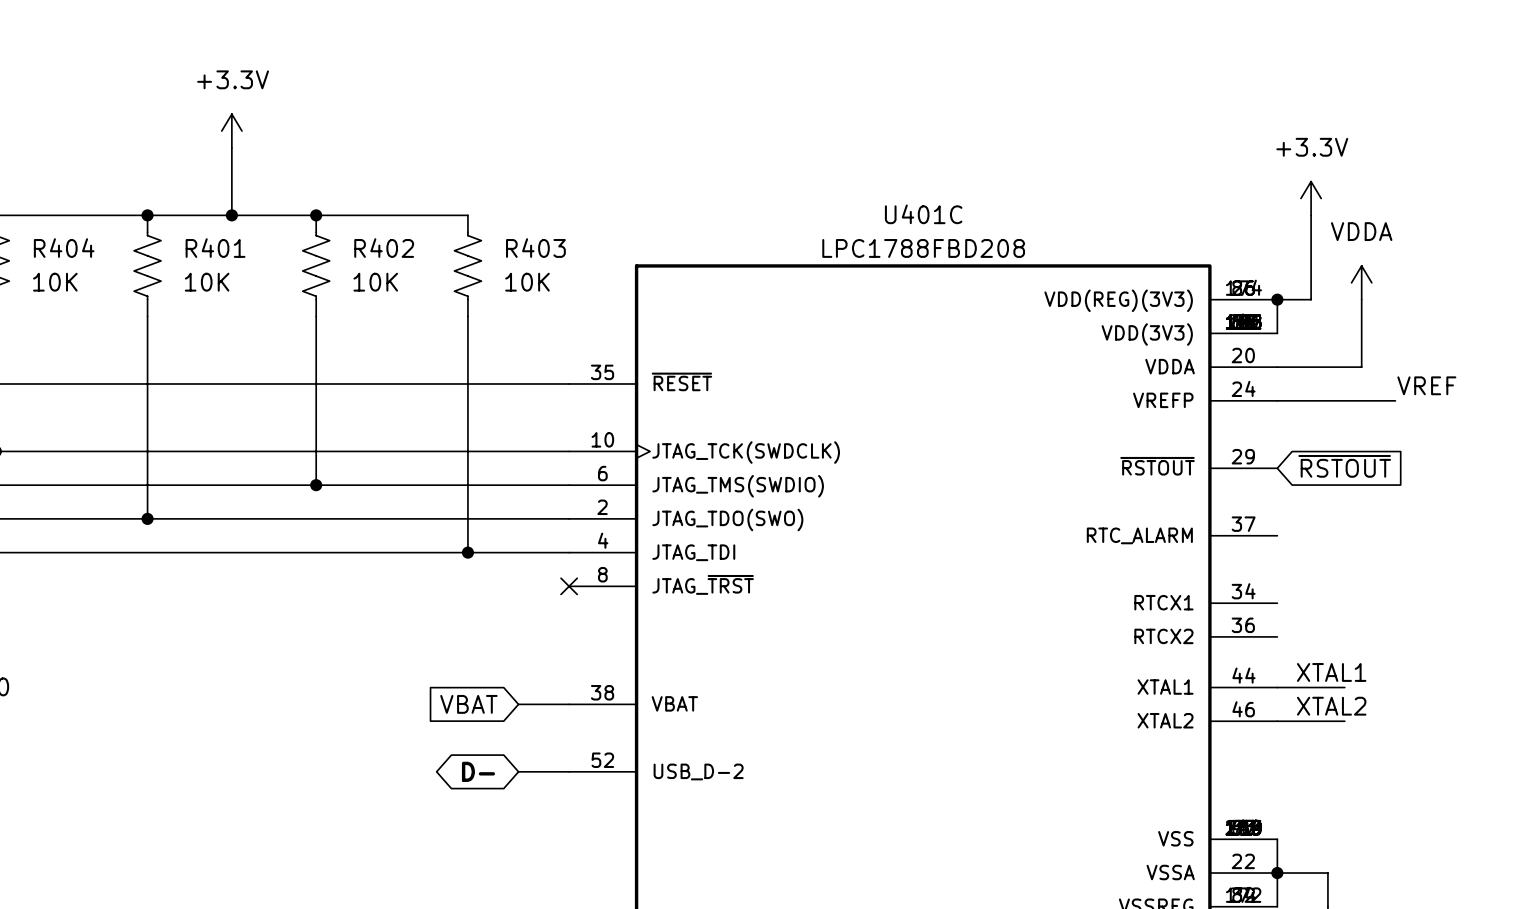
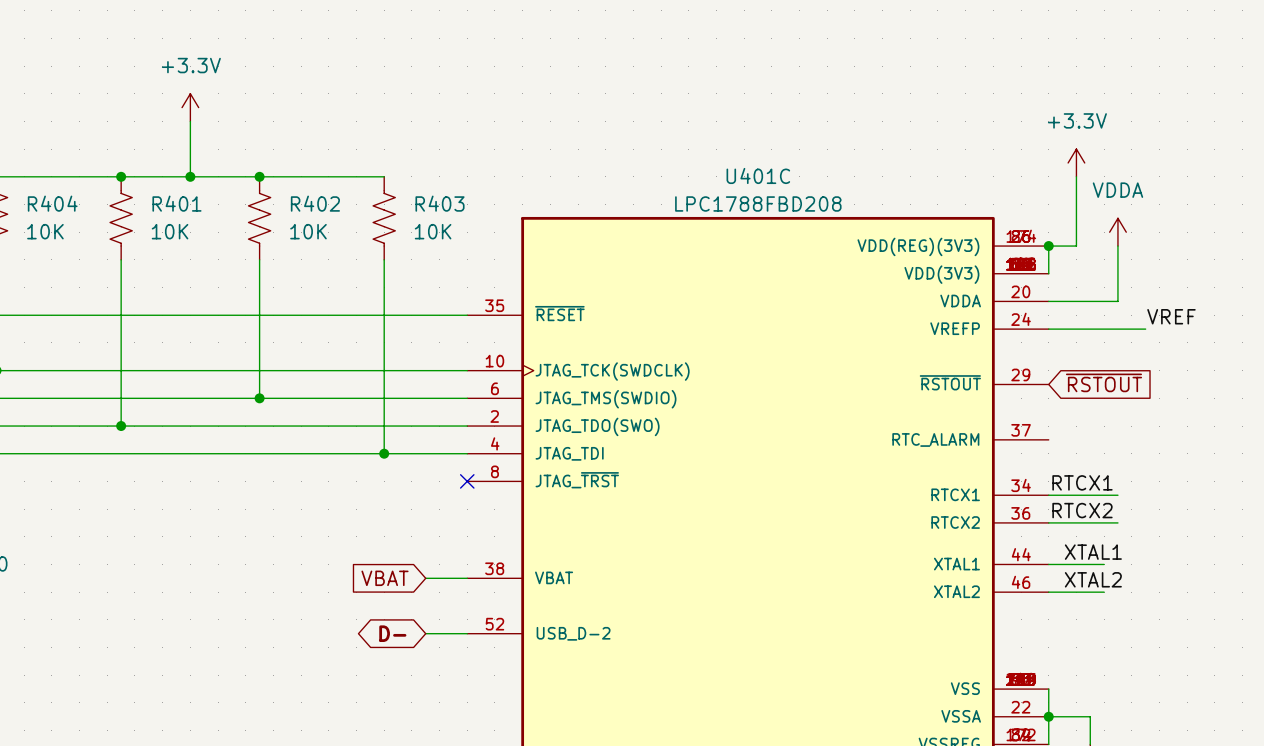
label: none -> RTCX1 (1082, 482)
wire: none -> (1048, 495) (1117, 495)
label: none -> RTCX2 (1082, 510)
wire: none -> (1048, 522) (1117, 522)

